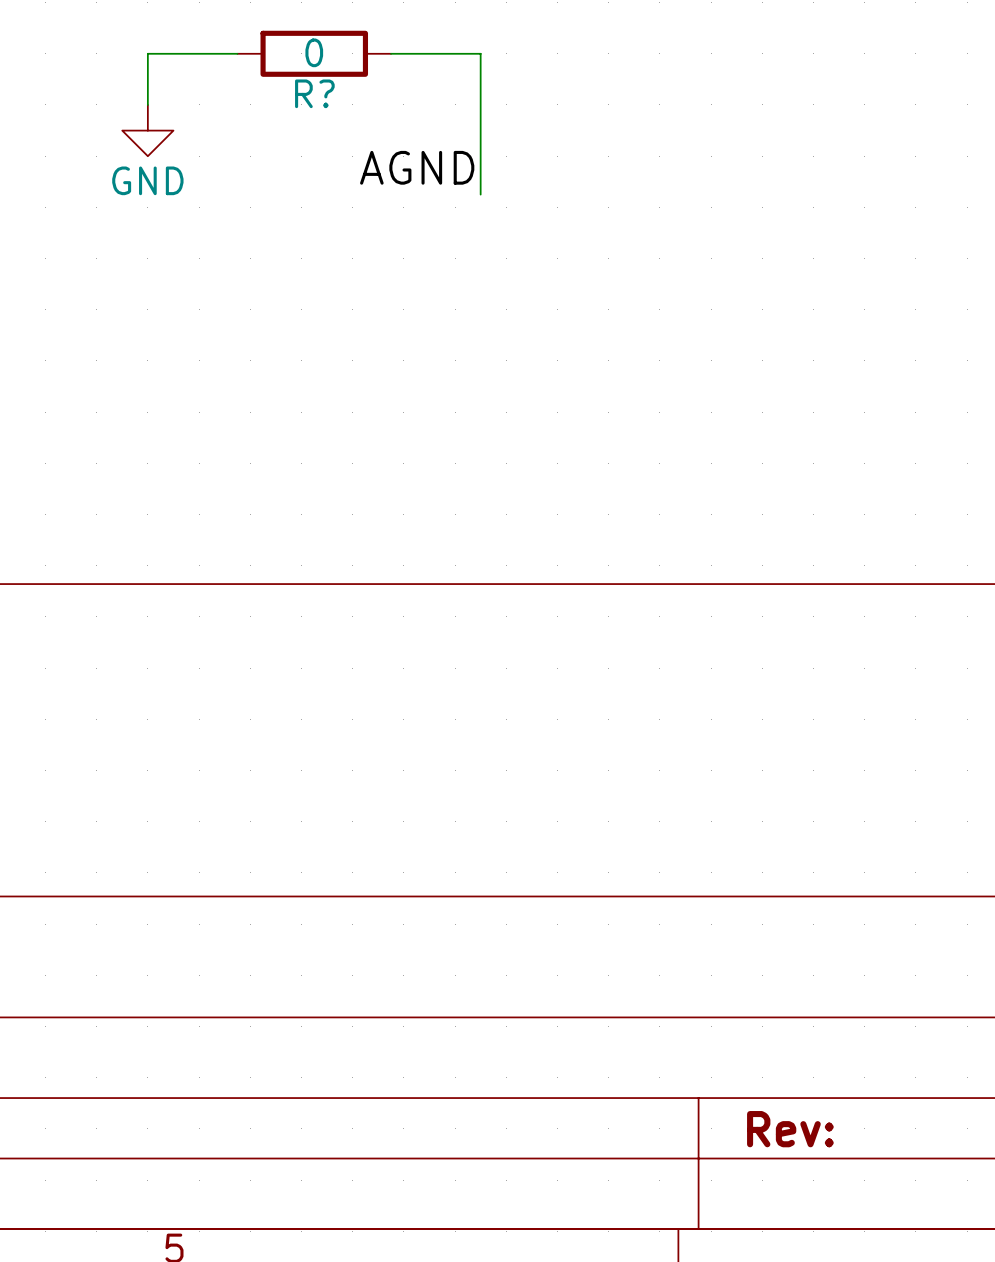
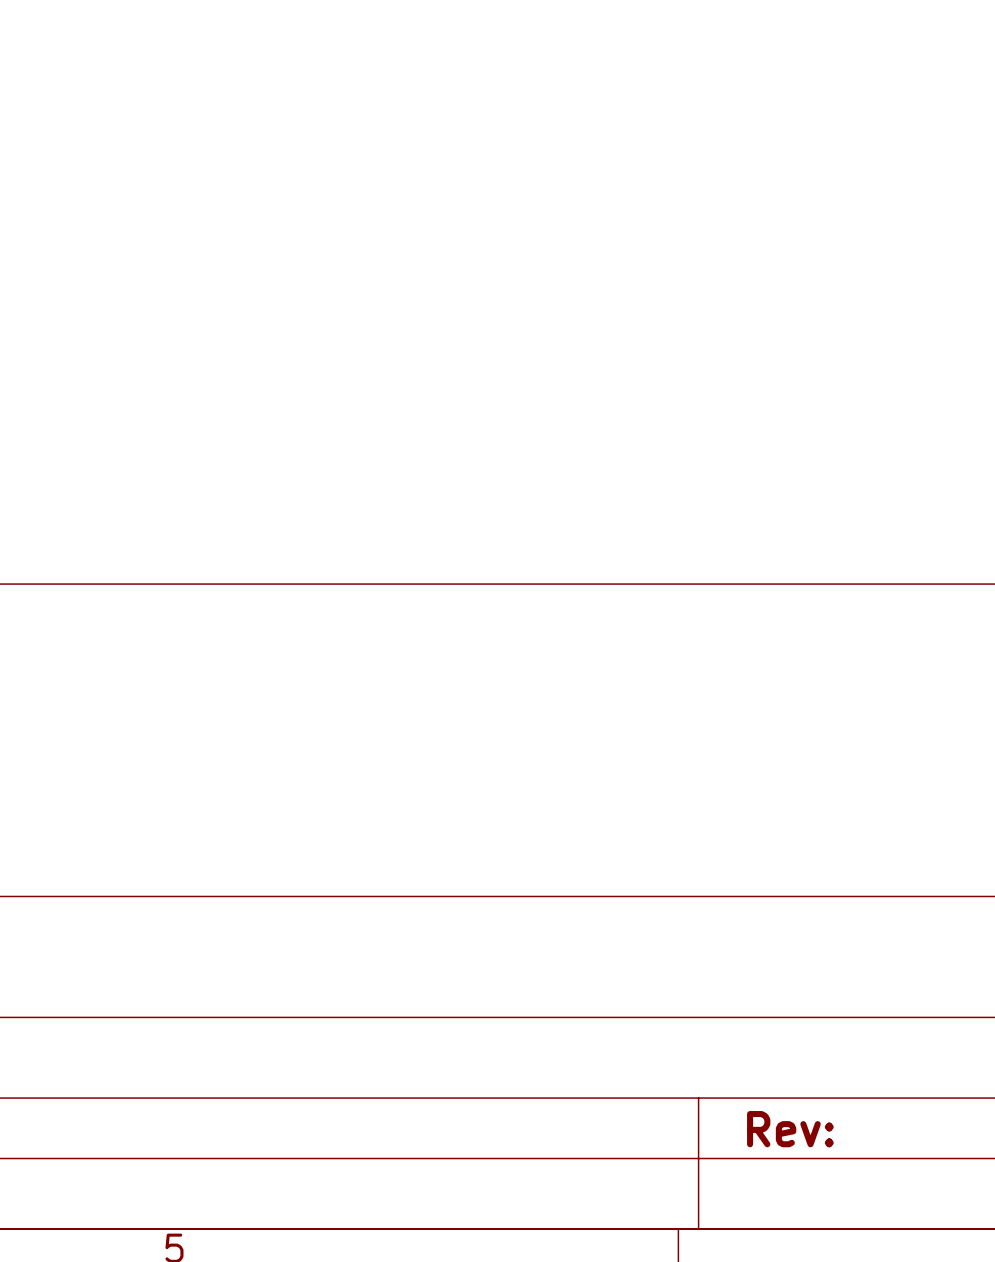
wire: (237, 53) (147, 53) (147, 104) -> none
R?: 0 (314, 53) -> none
wire: (391, 53) (480, 53) (480, 194) -> none
power symbol: GND (147, 130) -> none
label: AGND (417, 167) -> none

